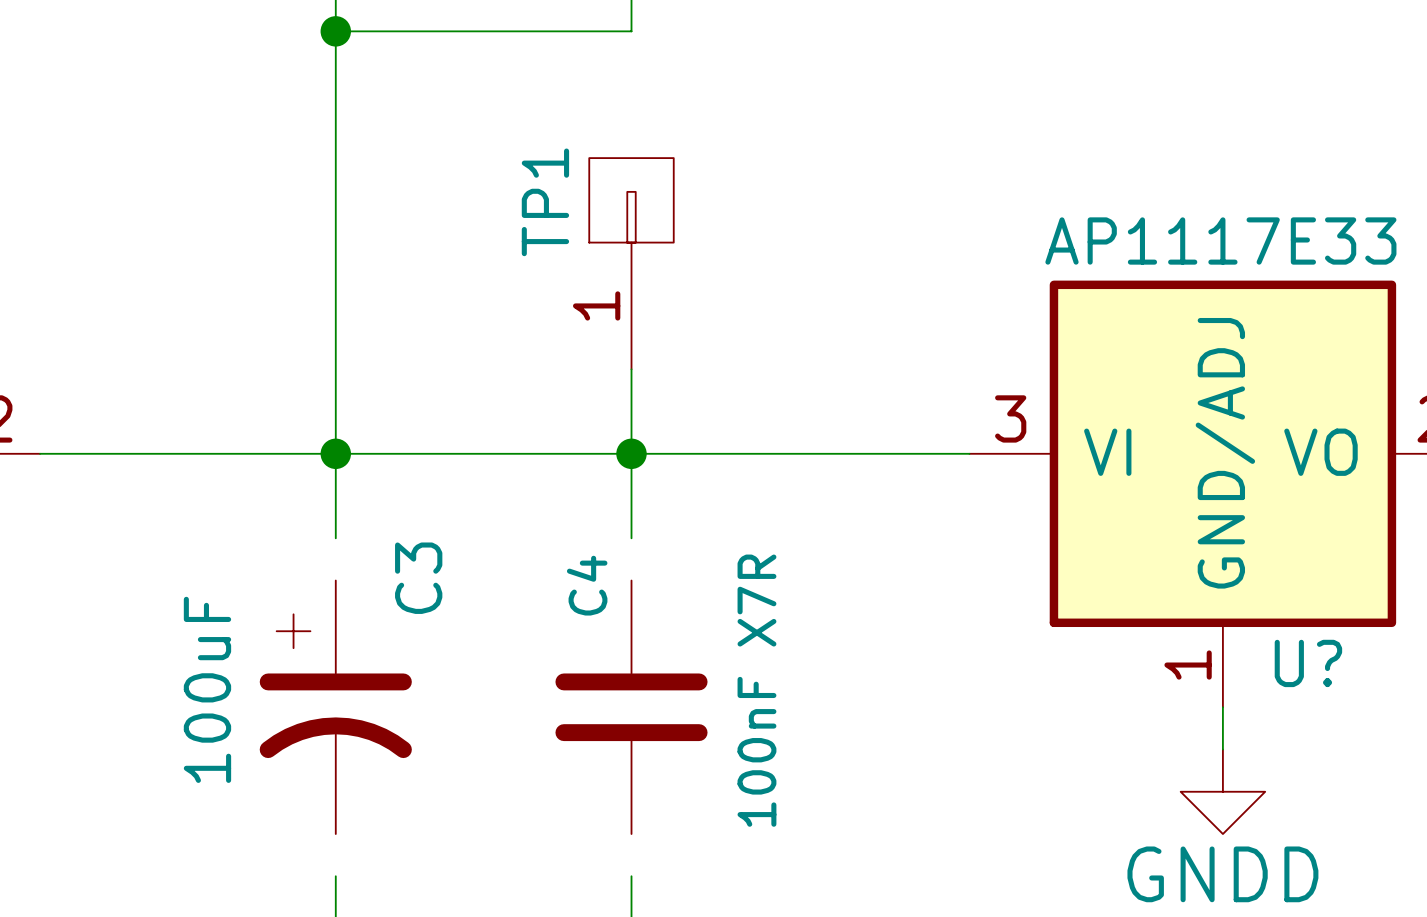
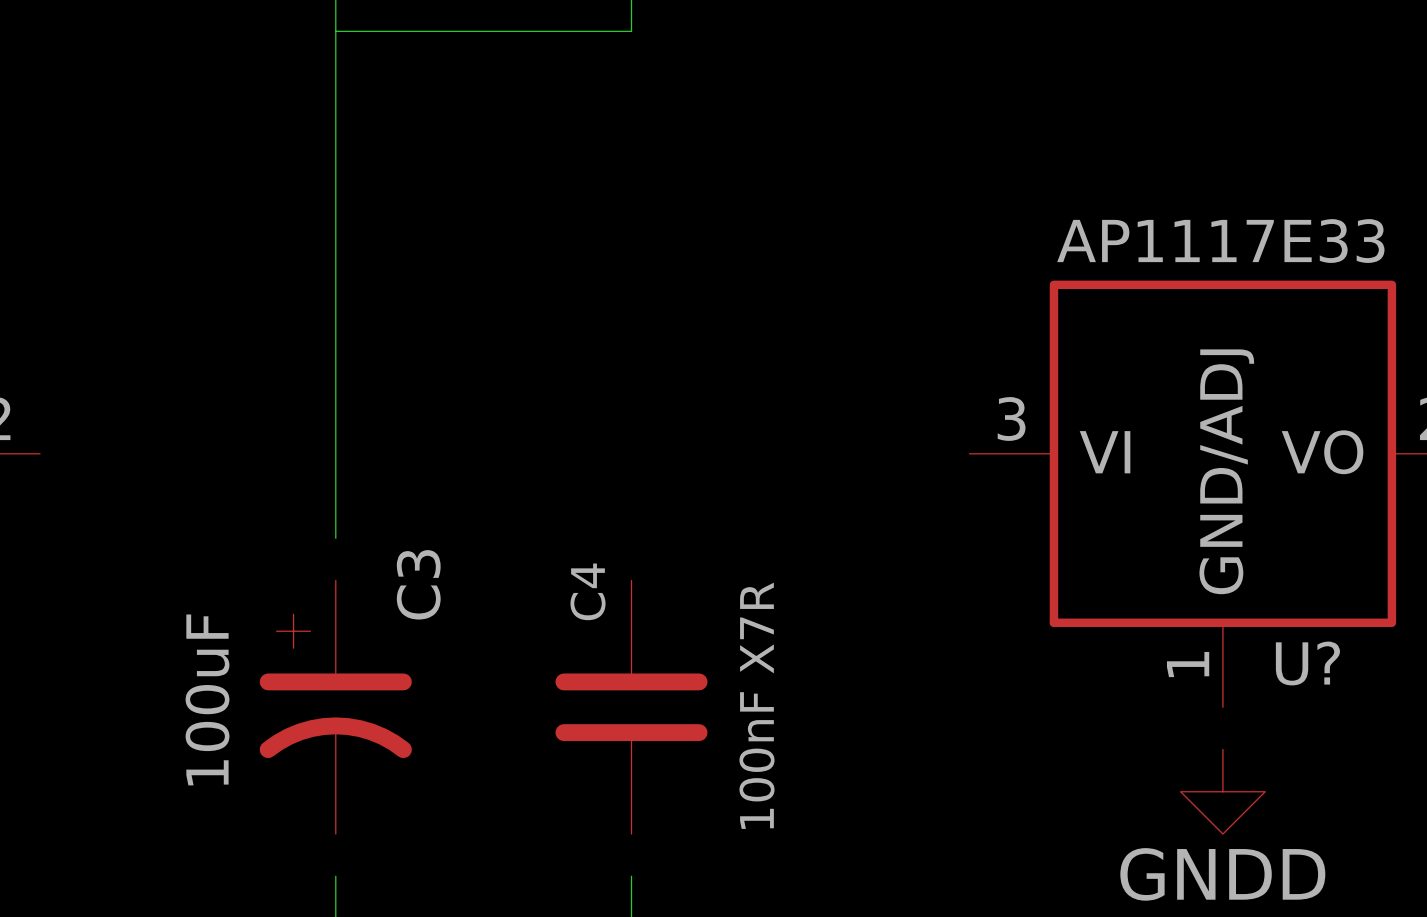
junction: (335, 31) -> none
TP1: (631, 263) -> none
wire: (631, 369) (631, 538) -> none
wire: (40, 453) (969, 453) -> none
junction: (335, 453) -> none
junction: (631, 453) -> none
wire: (1222, 707) (1222, 749) -> none

